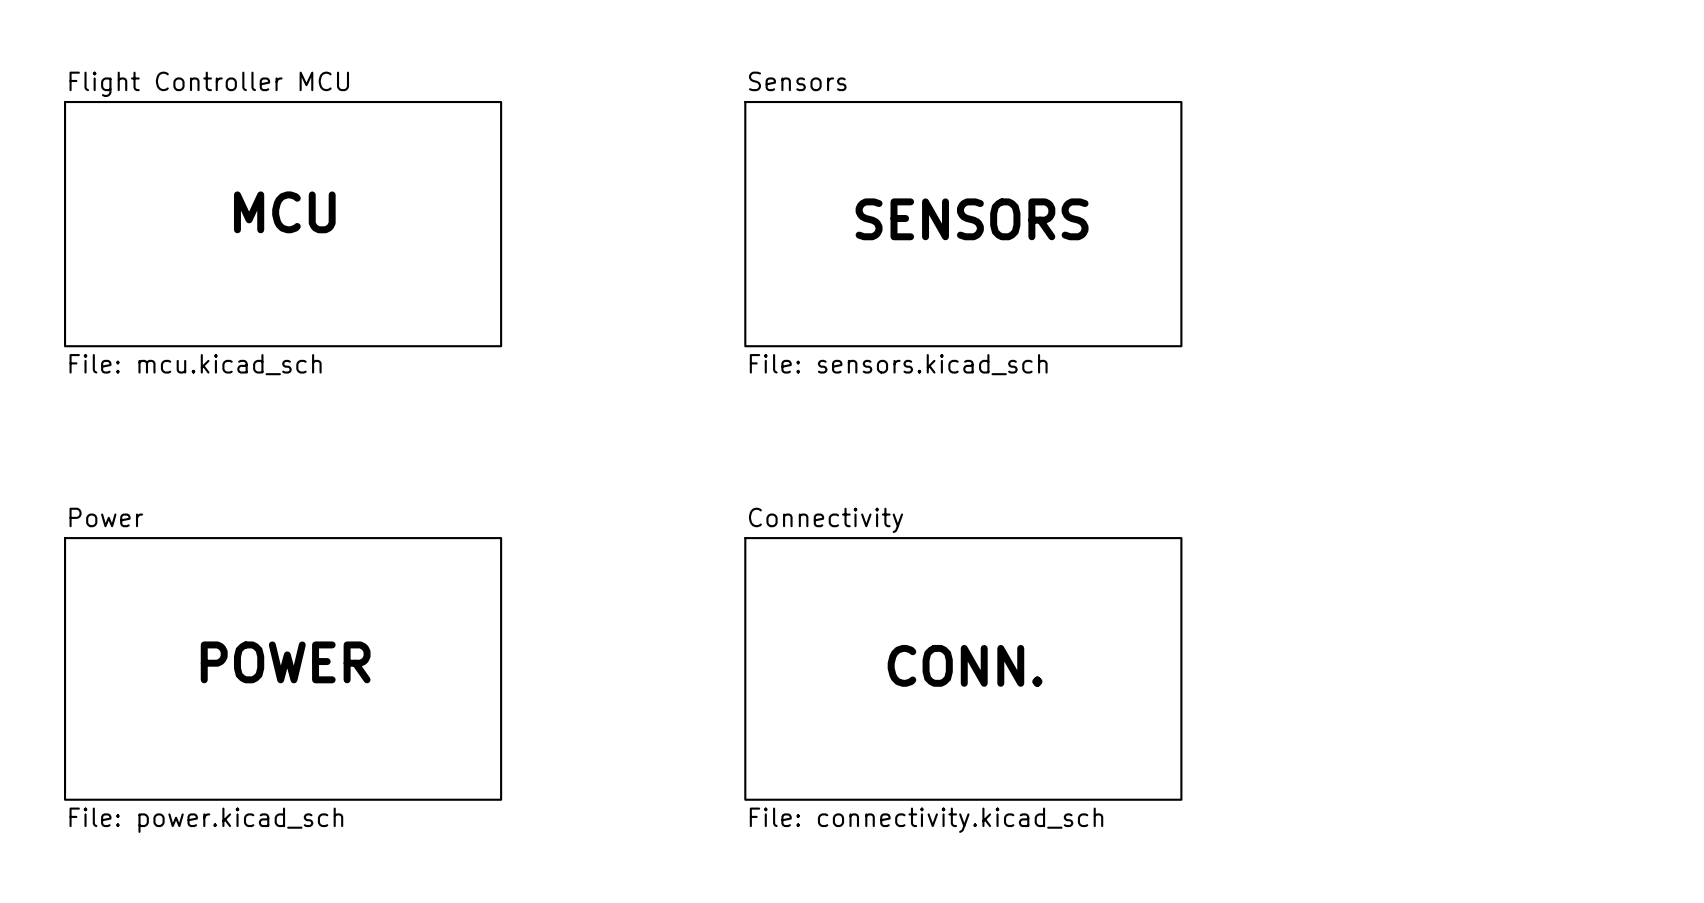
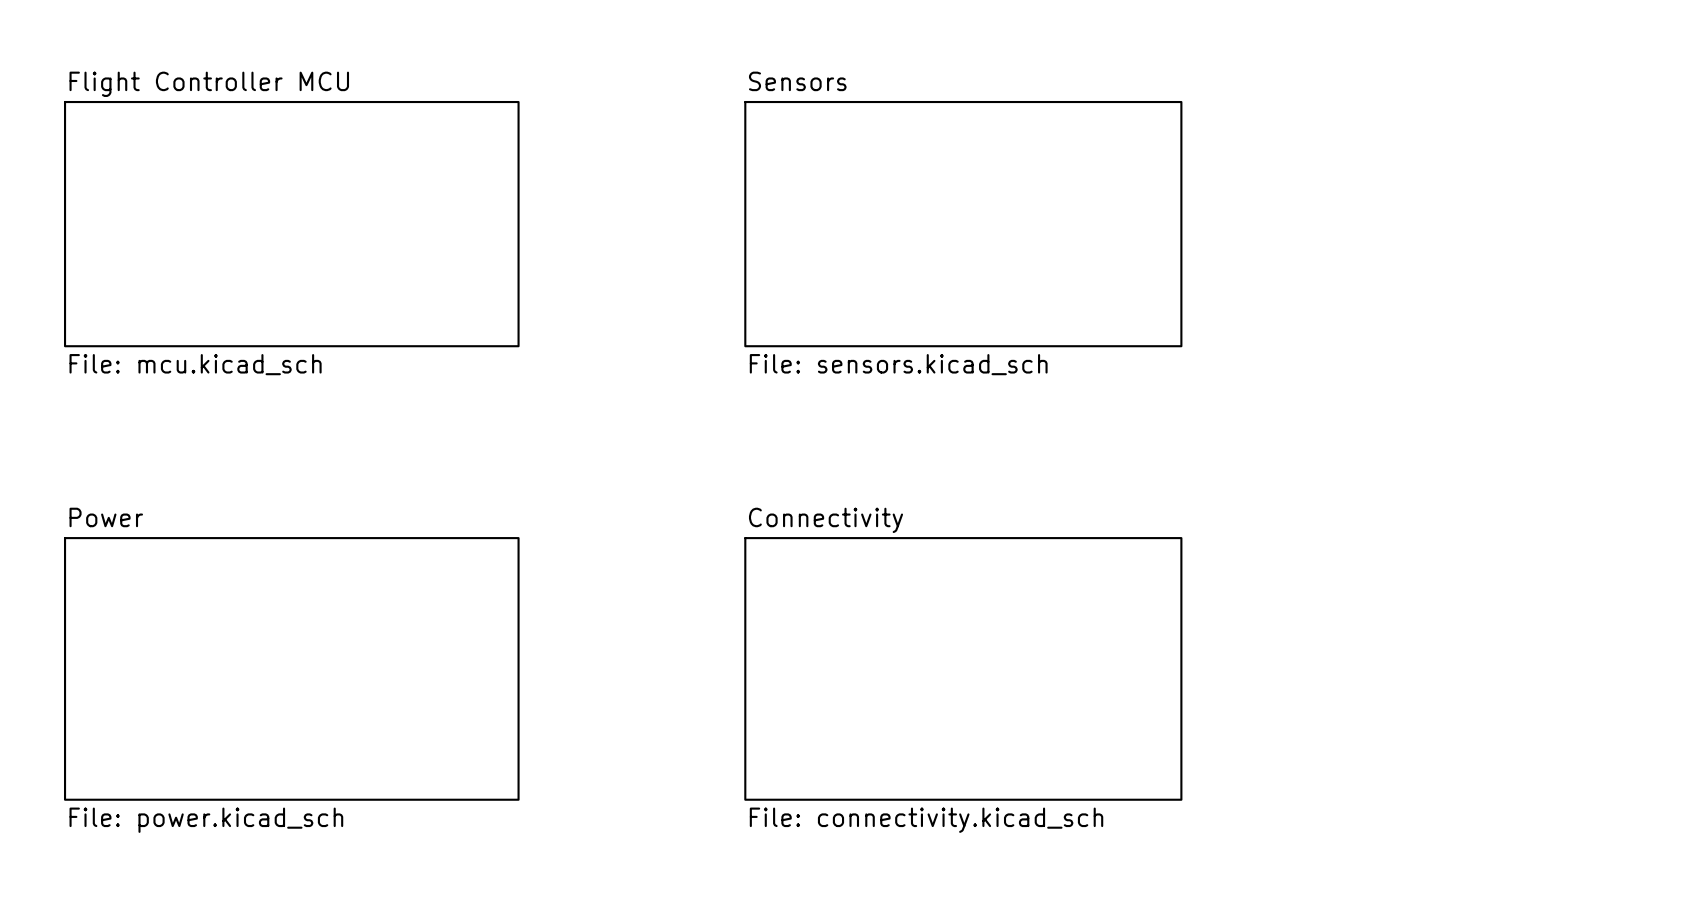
sheet Flight Controller MCU shape: [63, 100, 503, 348] -> [63, 100, 520, 348]
sheet Flight Controller MCU text: MCU (284, 212) -> none
sheet Sensors text: SENSORS (972, 219) -> none
sheet Power shape: [63, 537, 503, 801] -> [63, 537, 520, 801]
sheet Power text: POWER (285, 662) -> none
sheet Connectivity text: CONN. (965, 665) -> none

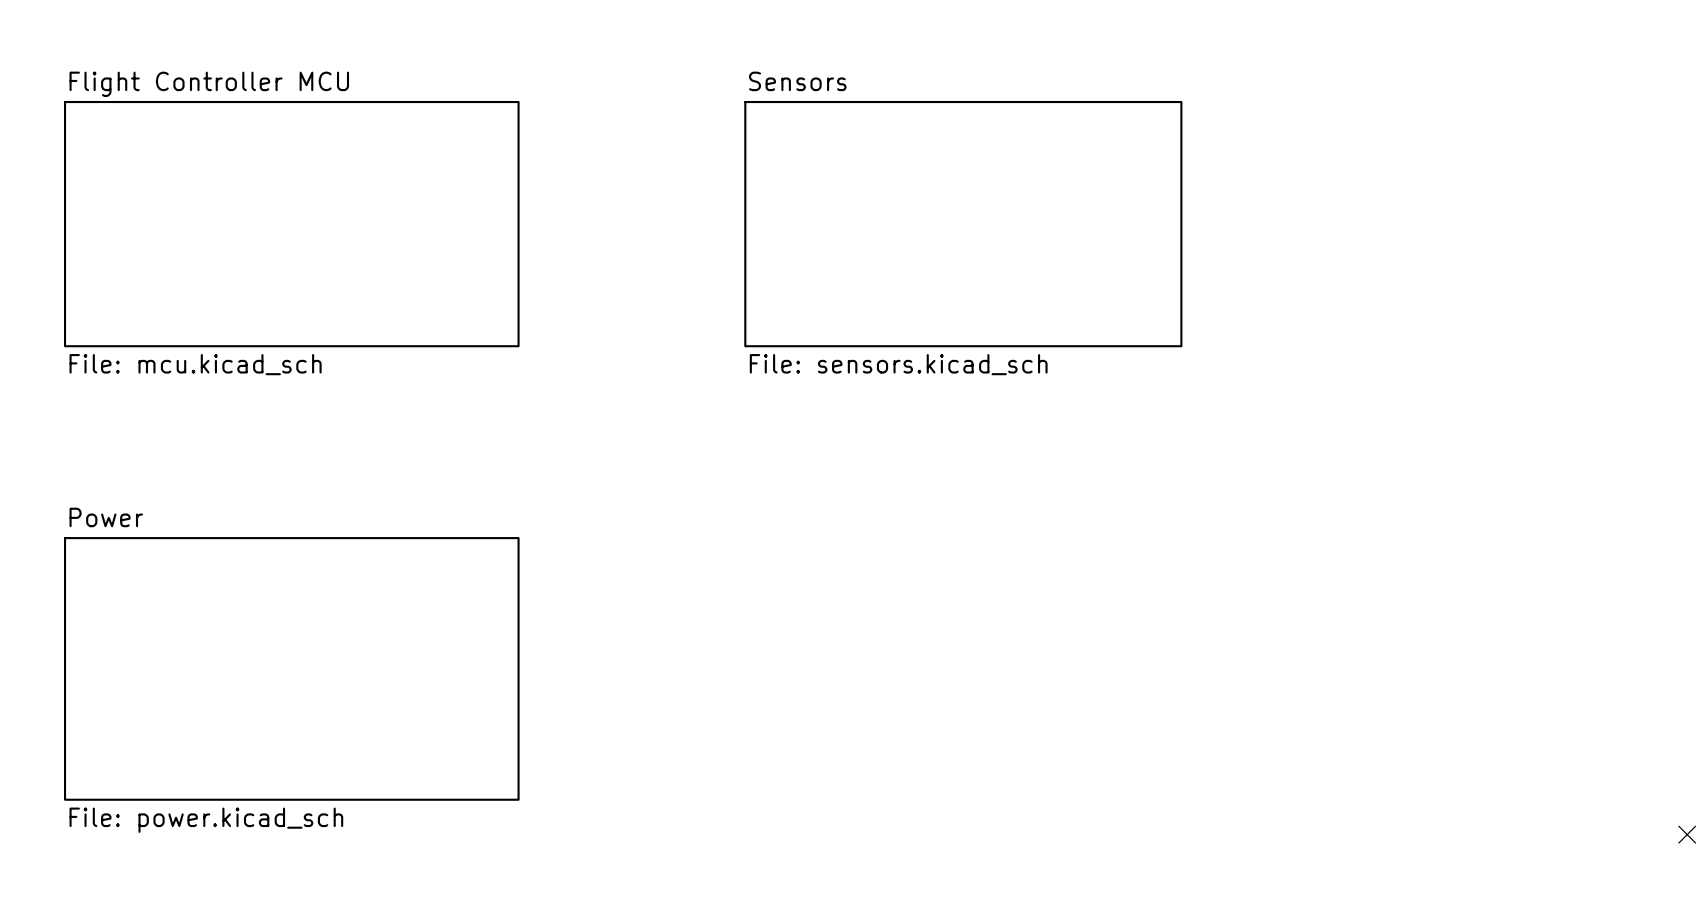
sheet Connectivity: File: connectivity.kicad_sch (963, 668) -> none
no-connect mark: none -> (1687, 834)

